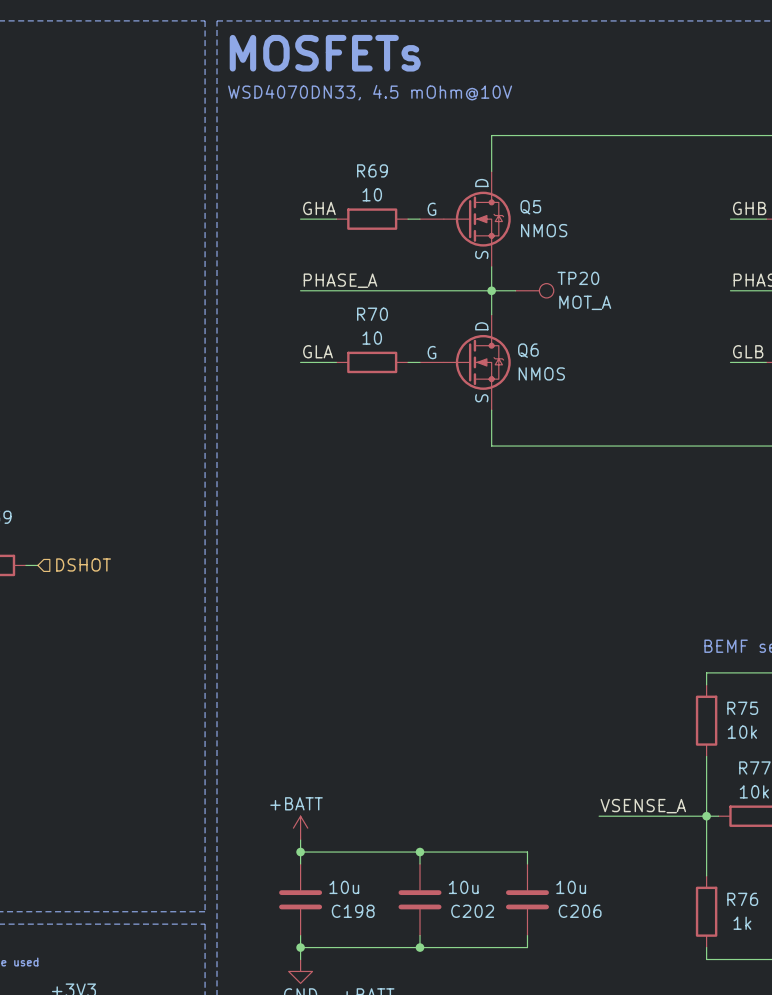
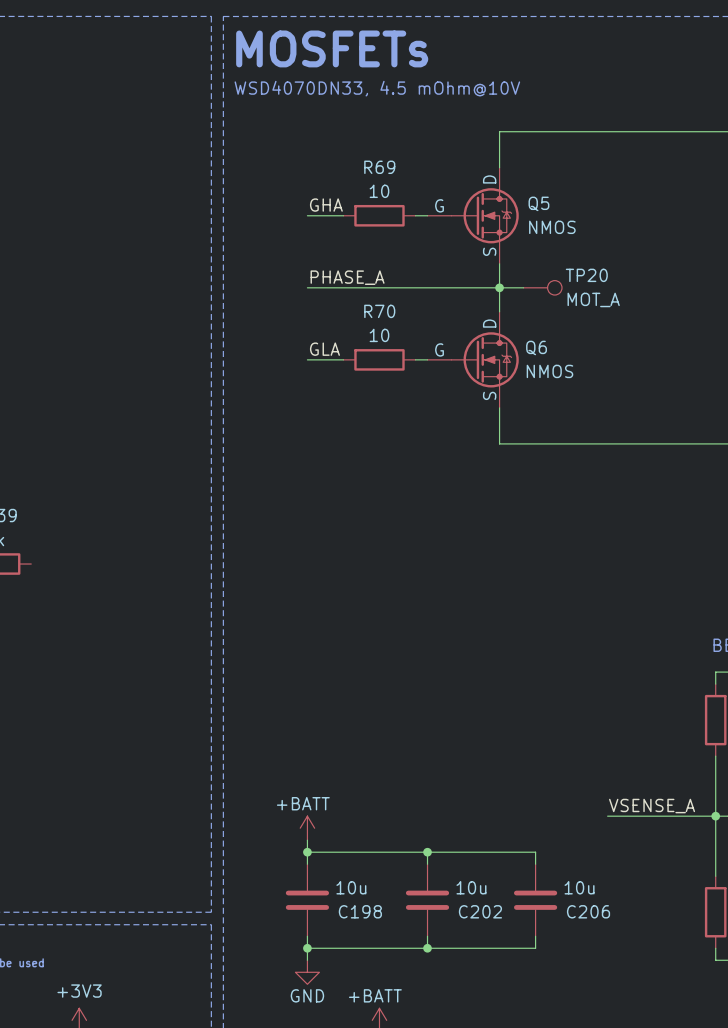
hierarchical label: DSHOT (83, 564) -> none
wire: (25, 565) (37, 565) -> none

